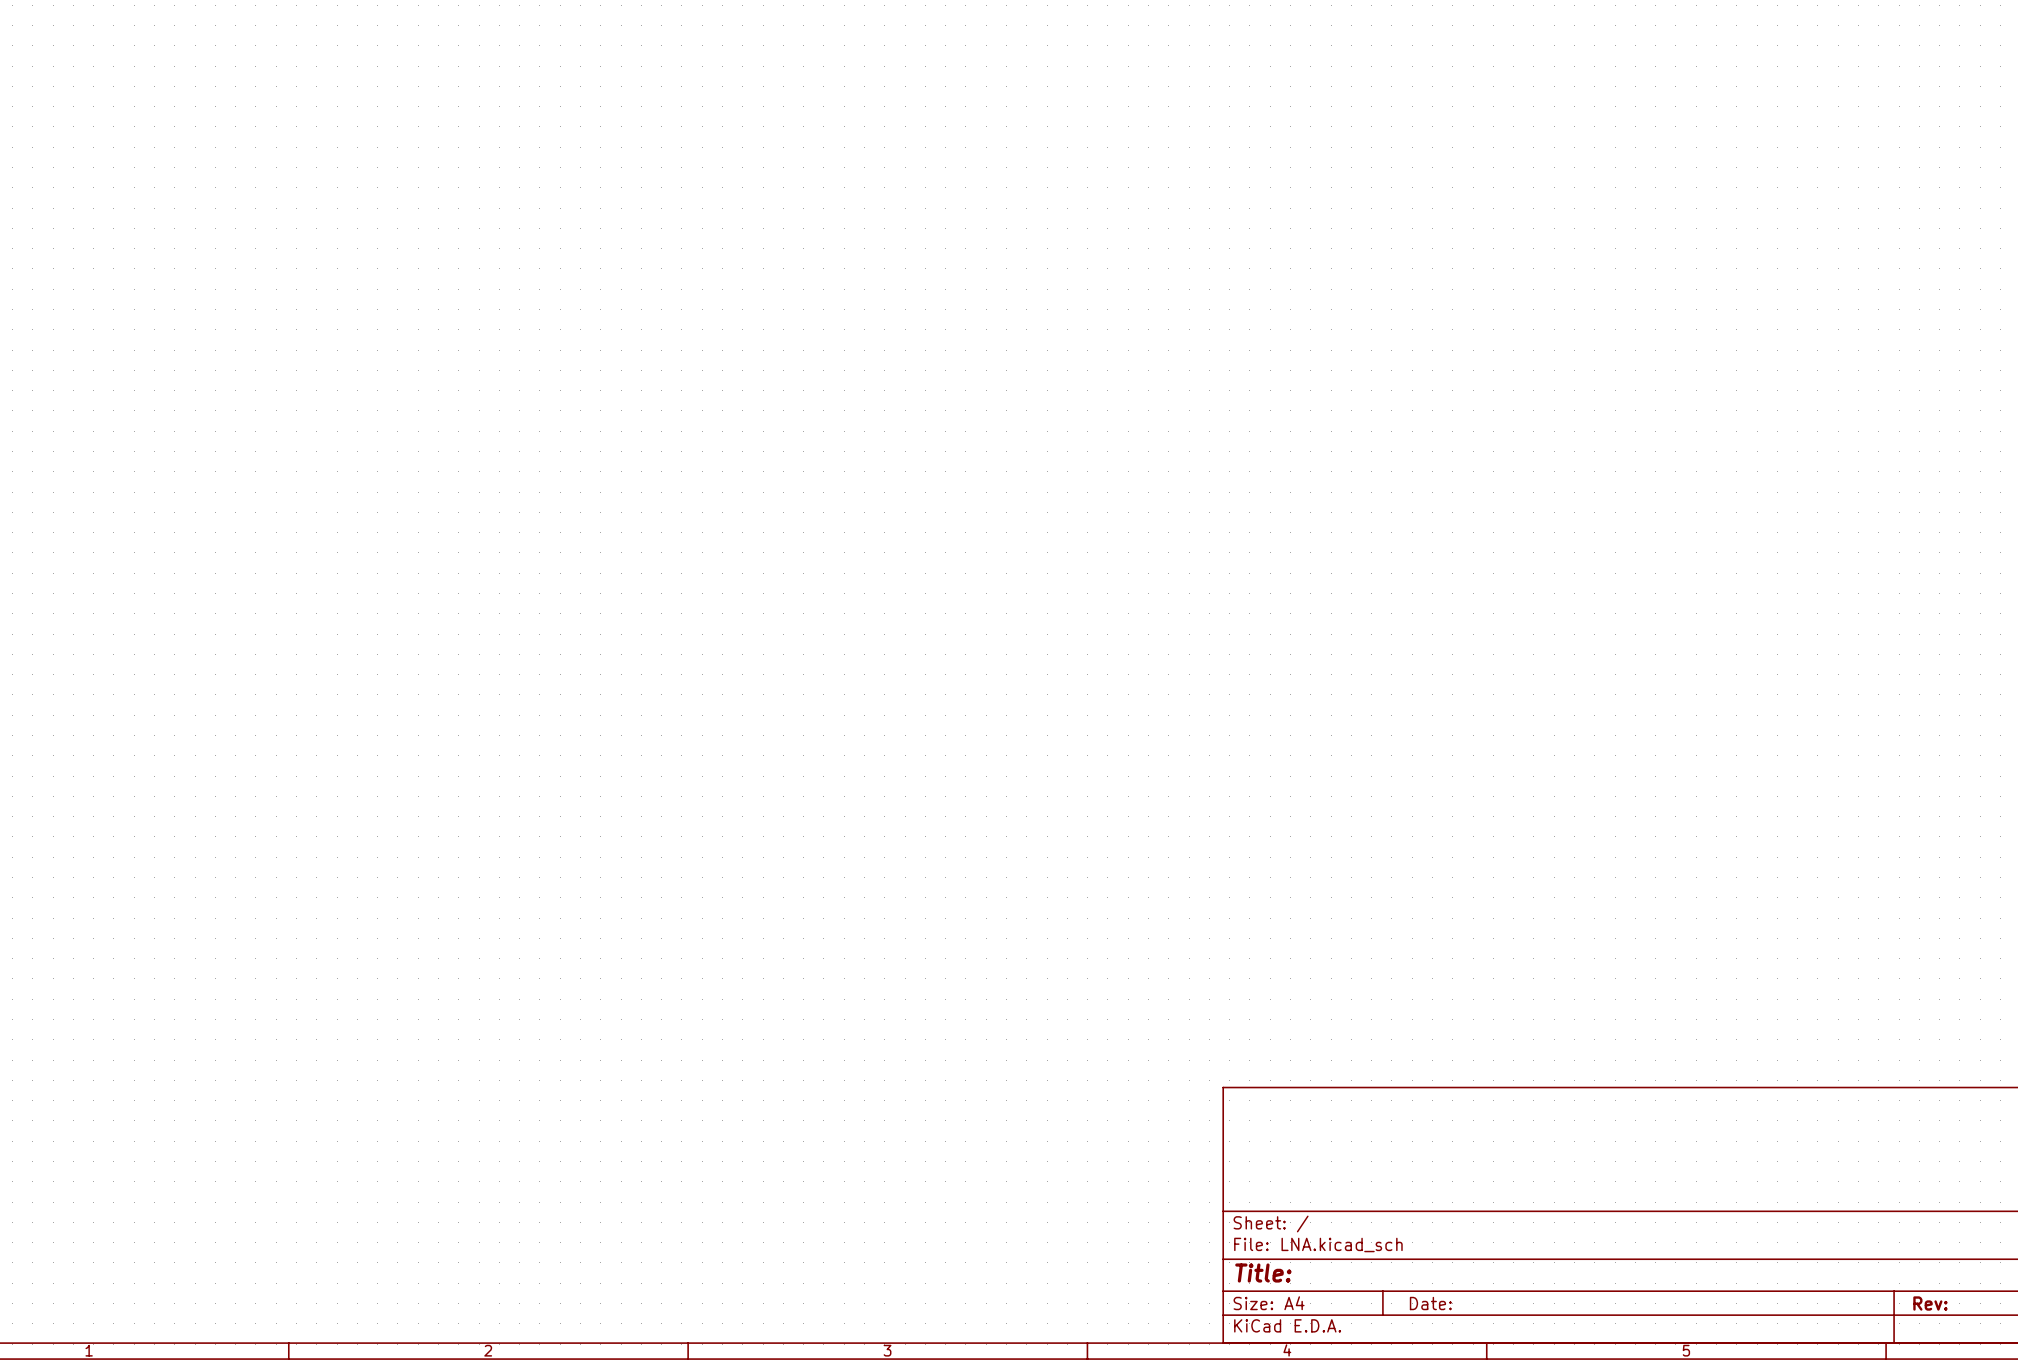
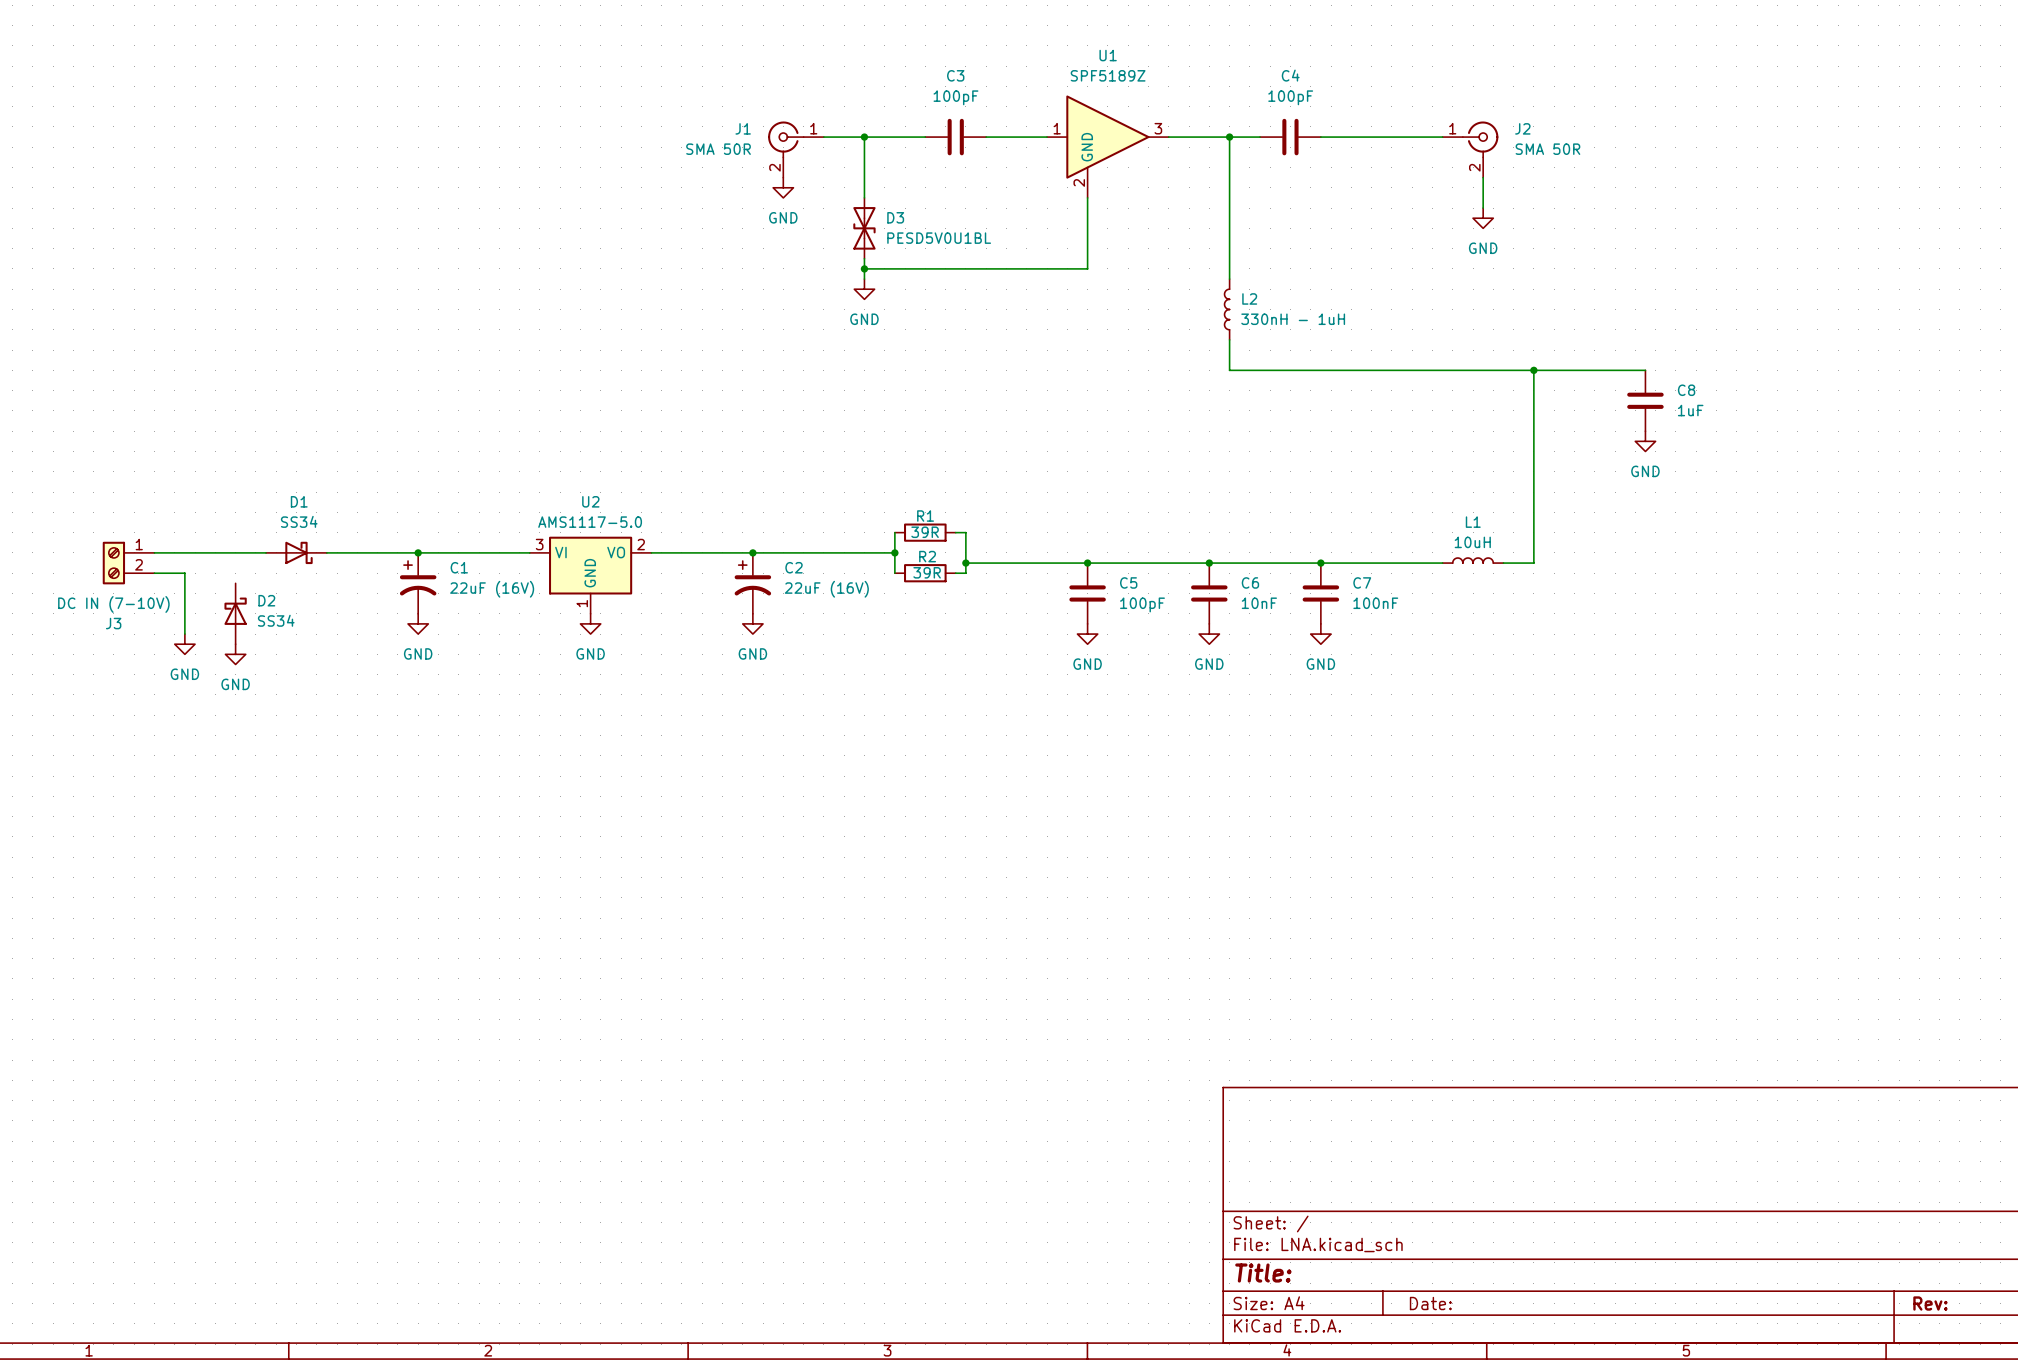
wire: none -> (823, 137) (925, 137)
wire: none -> (864, 137) (864, 197)
junction: none -> (864, 137)
C3: none -> 100pF (955, 137)
wire: none -> (986, 137) (1047, 137)
wire: none -> (1168, 137) (1260, 137)
wire: none -> (1229, 137) (1229, 279)
junction: none -> (1229, 137)
C4: none -> 100pF (1290, 137)
wire: none -> (1320, 137) (1442, 137)
U1: none -> SPF5189Z (1107, 146)
J1: none -> SMA 50R (795, 149)
J2: none -> SMA 50R (1470, 149)
wire: none -> (1483, 177) (1483, 208)
power symbol: none -> GND (783, 187)
wire: none -> (1087, 197) (1087, 268) (864, 268)
power symbol: none -> GND (1483, 218)
D3: none -> PESD5V0U1BL (864, 228)
wire: none -> (864, 258) (864, 279)
junction: none -> (864, 268)
power symbol: none -> GND (864, 289)
L2: none -> 330nH - 1uH (1227, 309)
wire: none -> (1229, 339) (1229, 370) (1645, 370)
wire: none -> (1533, 370) (1533, 563) (1503, 563)
junction: none -> (1533, 370)
C8: none -> 1uF (1645, 400)
power symbol: none -> GND (1645, 441)
wire: none -> (894, 532) (894, 573)
R1: none -> 39R (925, 532)
wire: none -> (955, 532) (965, 532) (965, 573) (955, 573)
wire: none -> (154, 552) (266, 552)
D1: none -> SS34 (296, 552)
wire: none -> (326, 552) (529, 552)
junction: none -> (418, 552)
wire: none -> (651, 552) (894, 552)
junction: none -> (752, 552)
junction: none -> (894, 552)
L1: none -> 10uH (1473, 560)
J3: none -> DC IN (7-10V) (128, 563)
wire: none -> (965, 563) (1442, 563)
junction: none -> (965, 563)
junction: none -> (1087, 563)
junction: none -> (1209, 563)
junction: none -> (1320, 563)
wire: none -> (154, 573) (184, 573) (184, 634)
R2: none -> 39R (925, 573)
U2: none -> AMS1117-5.0 (590, 575)
C1: none -> 22uF (16V) (418, 583)
C2: none -> 22uF (16V) (752, 583)
C5: none -> 100pF (1087, 593)
C6: none -> 10nF (1209, 593)
C7: none -> 100nF (1320, 593)
D2: none -> SS34 (235, 613)
power symbol: none -> GND (418, 623)
power symbol: none -> GND (590, 623)
power symbol: none -> GND (752, 623)
power symbol: none -> GND (1087, 634)
power symbol: none -> GND (1209, 634)
power symbol: none -> GND (1320, 634)
power symbol: none -> GND (184, 644)
power symbol: none -> GND (235, 654)

